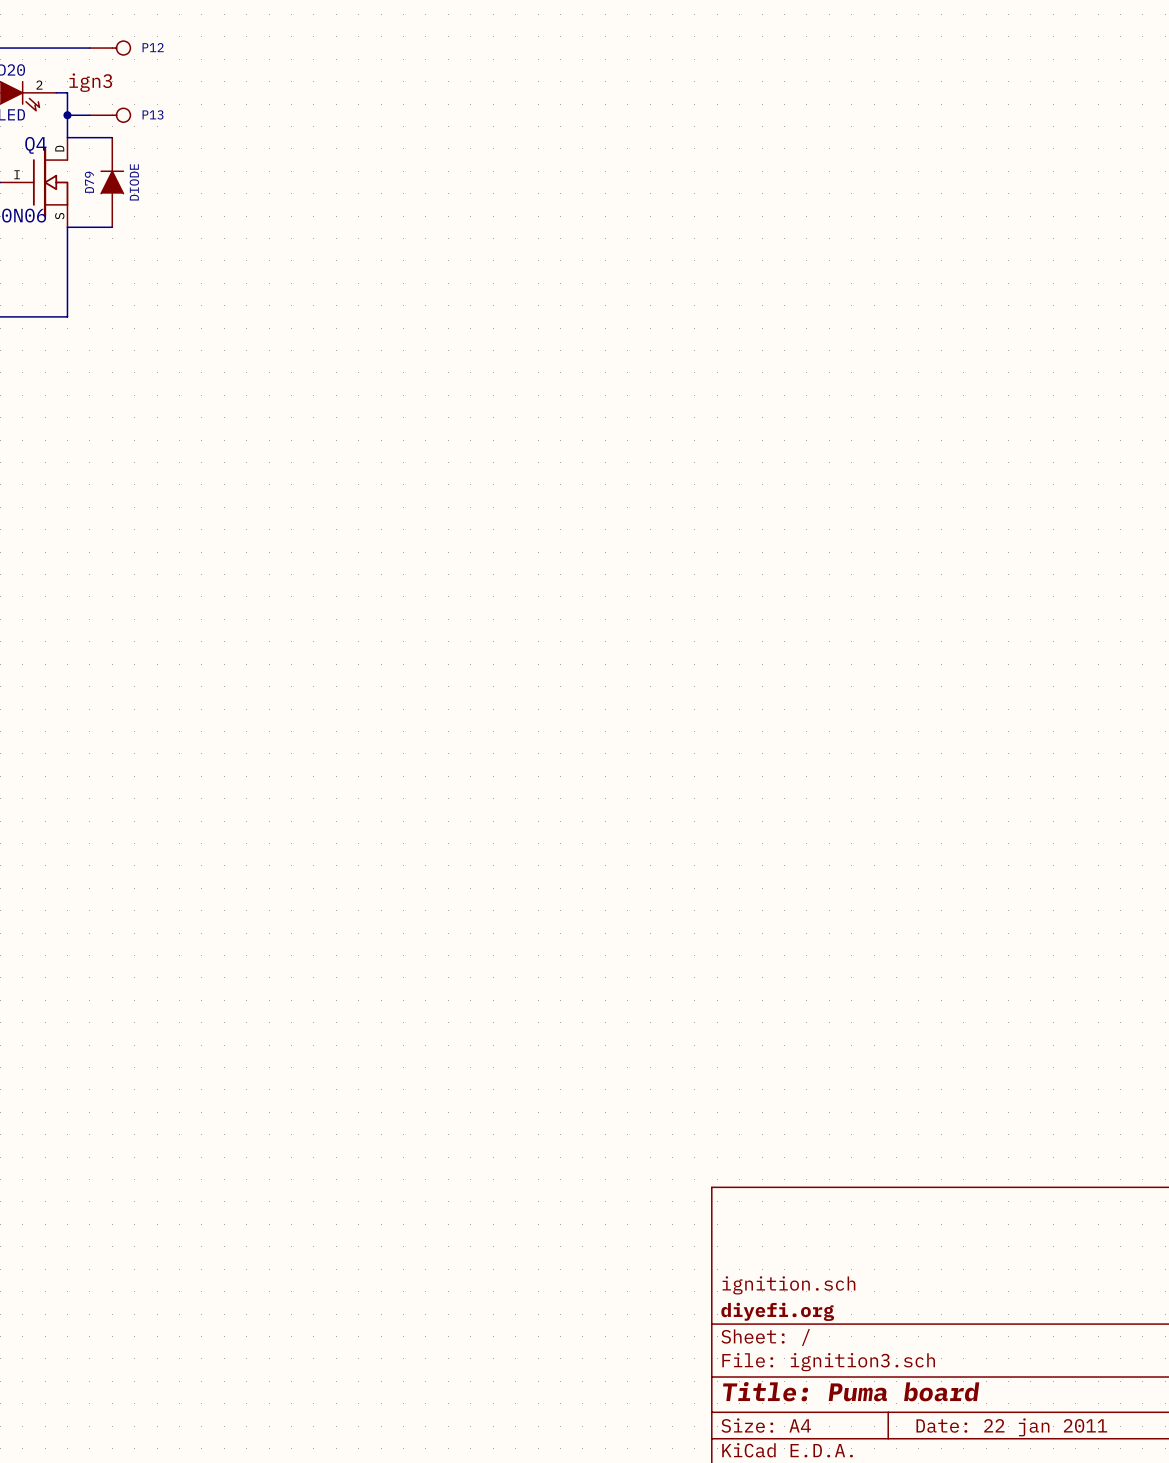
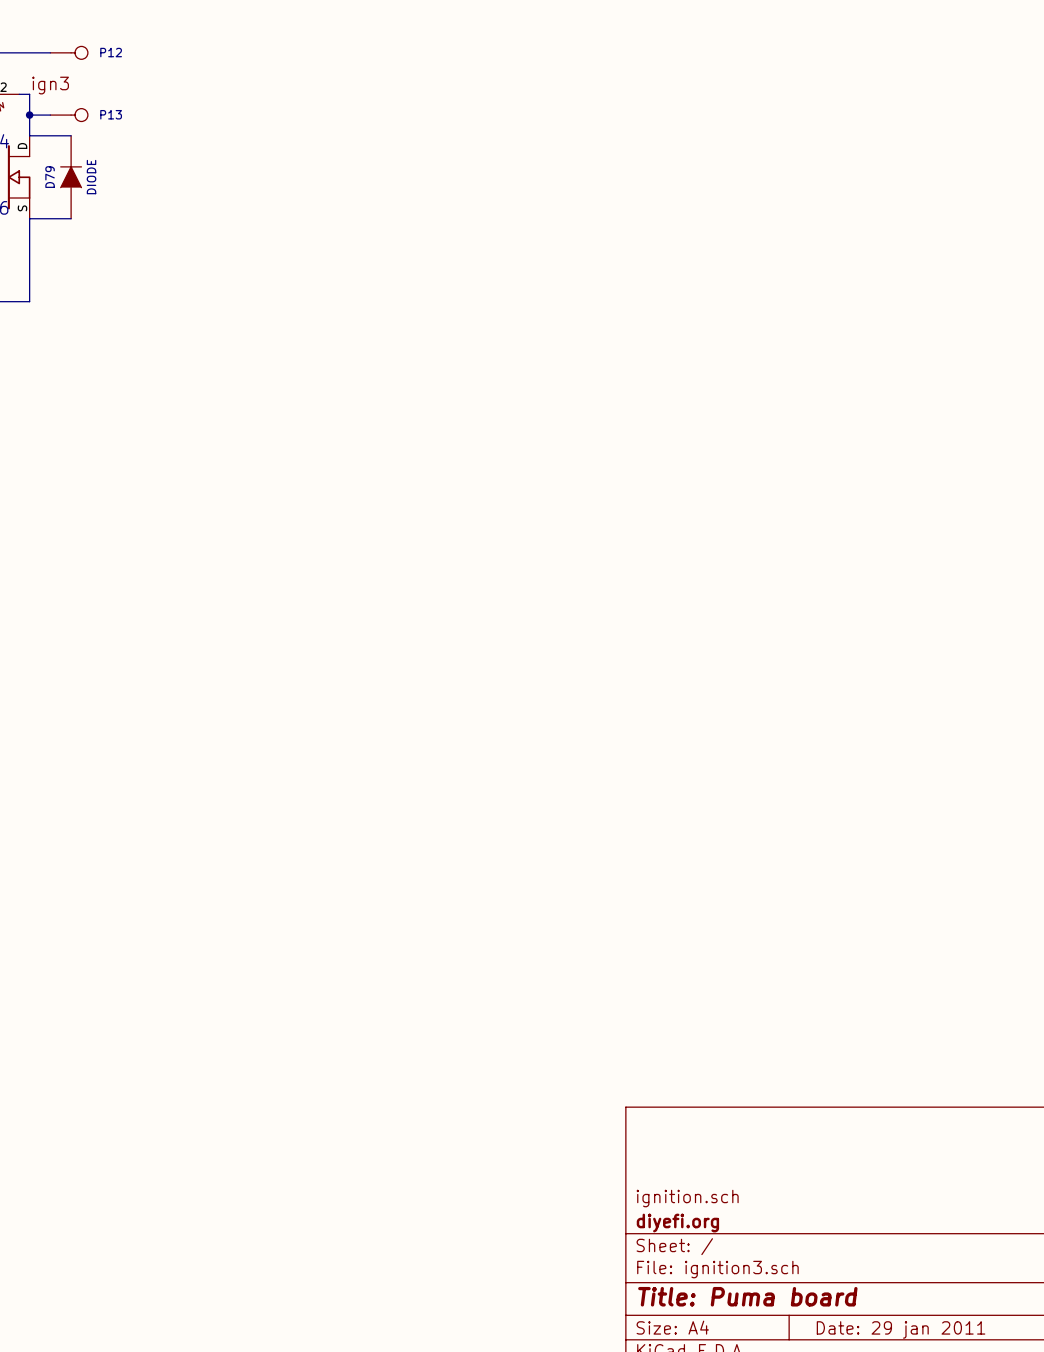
title block: Date: 22 jan 2011 (1011, 1427) -> Date: 29 jan 2011 (901, 1329)

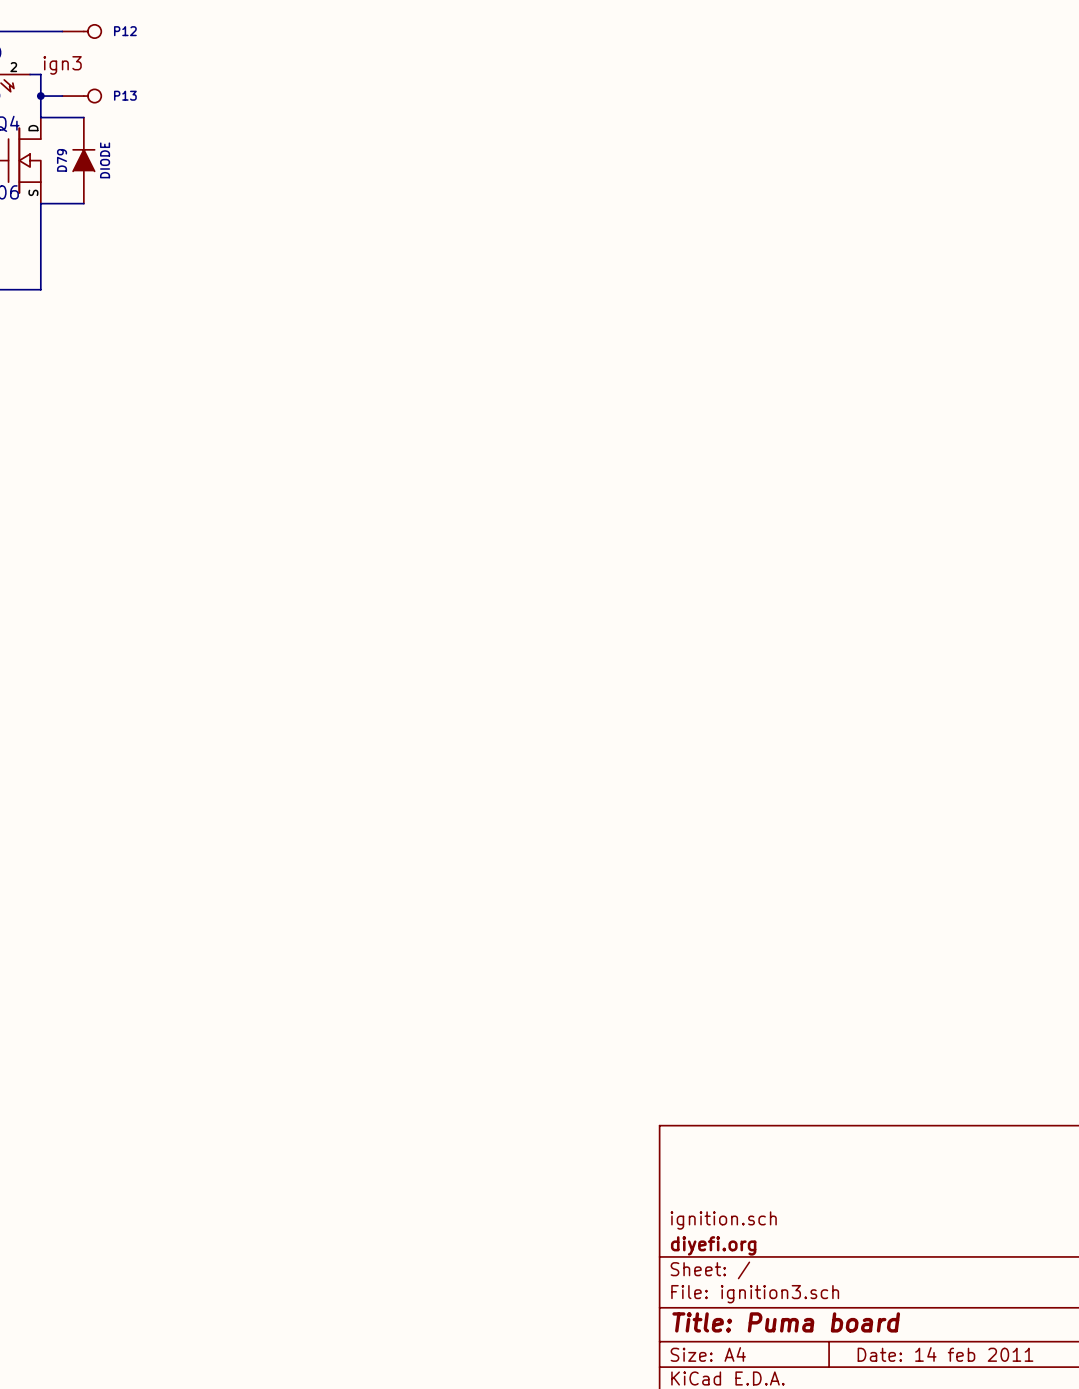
title block: Date: 29 jan 2011 (901, 1329) -> Date: 14 feb 2011 (945, 1354)

